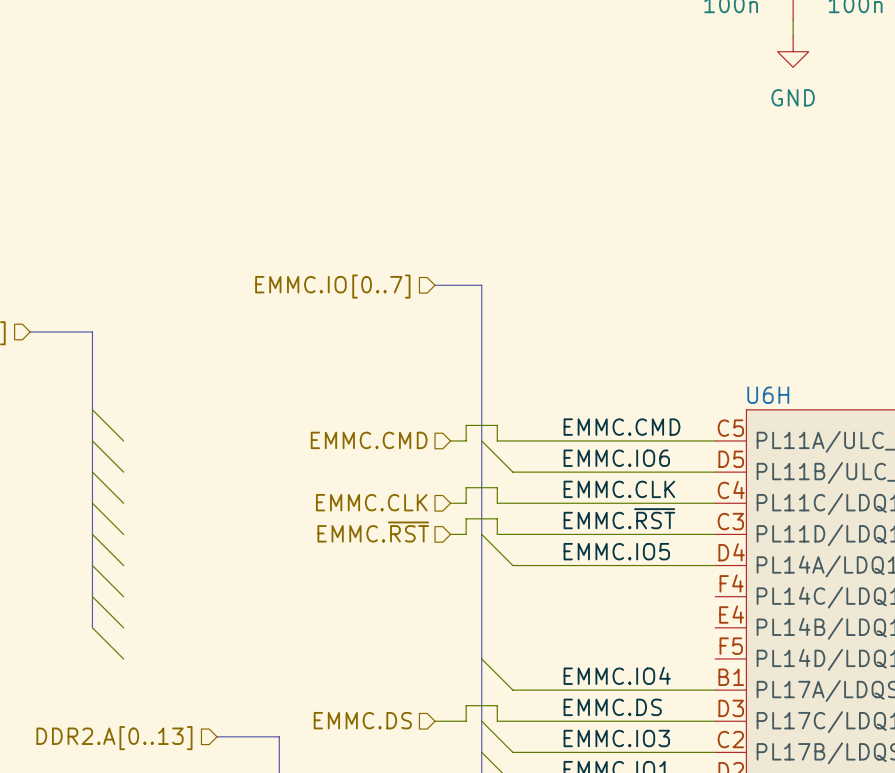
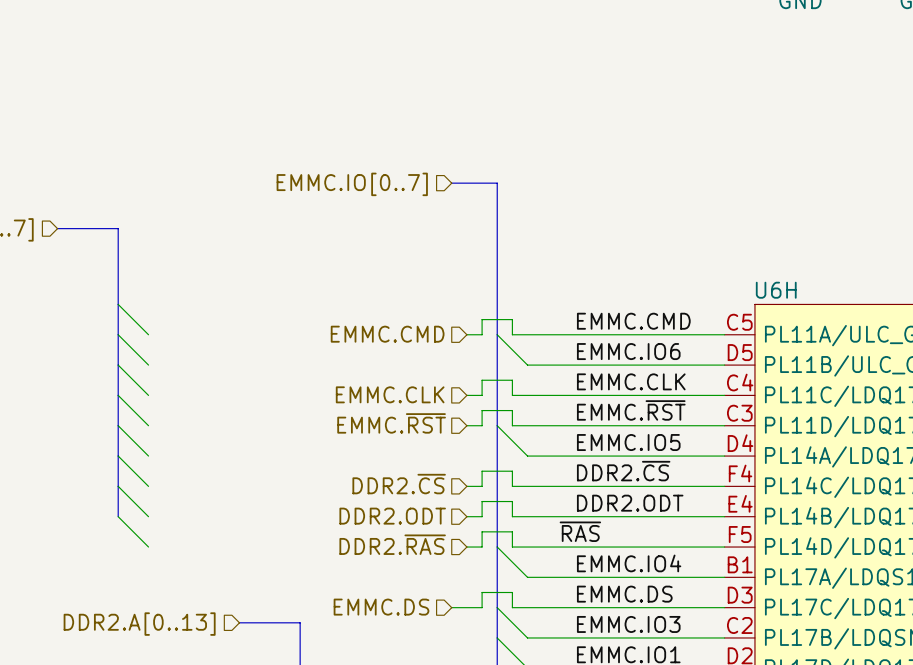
label: none -> DDR2.~{CS} (623, 471)
hierarchical label: none -> DDR2.~{CS} (399, 484)
wire: none -> (466, 486) (482, 486) (482, 471) (512, 471) (512, 486) (724, 486)
label: none -> DDR2.ODT (630, 503)
hierarchical label: none -> DDR2.ODT (392, 516)
wire: none -> (466, 516) (482, 516) (482, 501) (512, 501) (512, 516) (724, 516)
label: none -> ~{RAS} (580, 531)
hierarchical label: none -> DDR2.~{RAS} (392, 544)
wire: none -> (466, 547) (482, 547) (482, 531) (512, 531) (512, 547) (724, 547)

